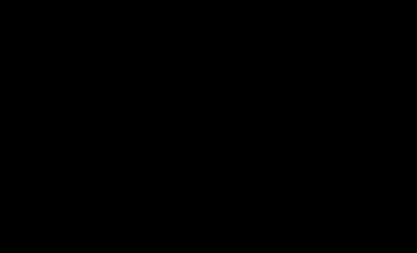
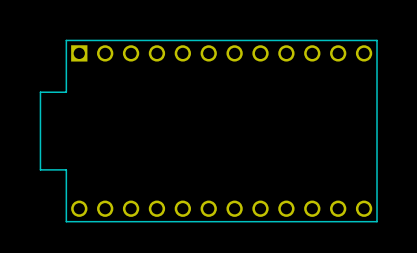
part: none -> (208, 131)

